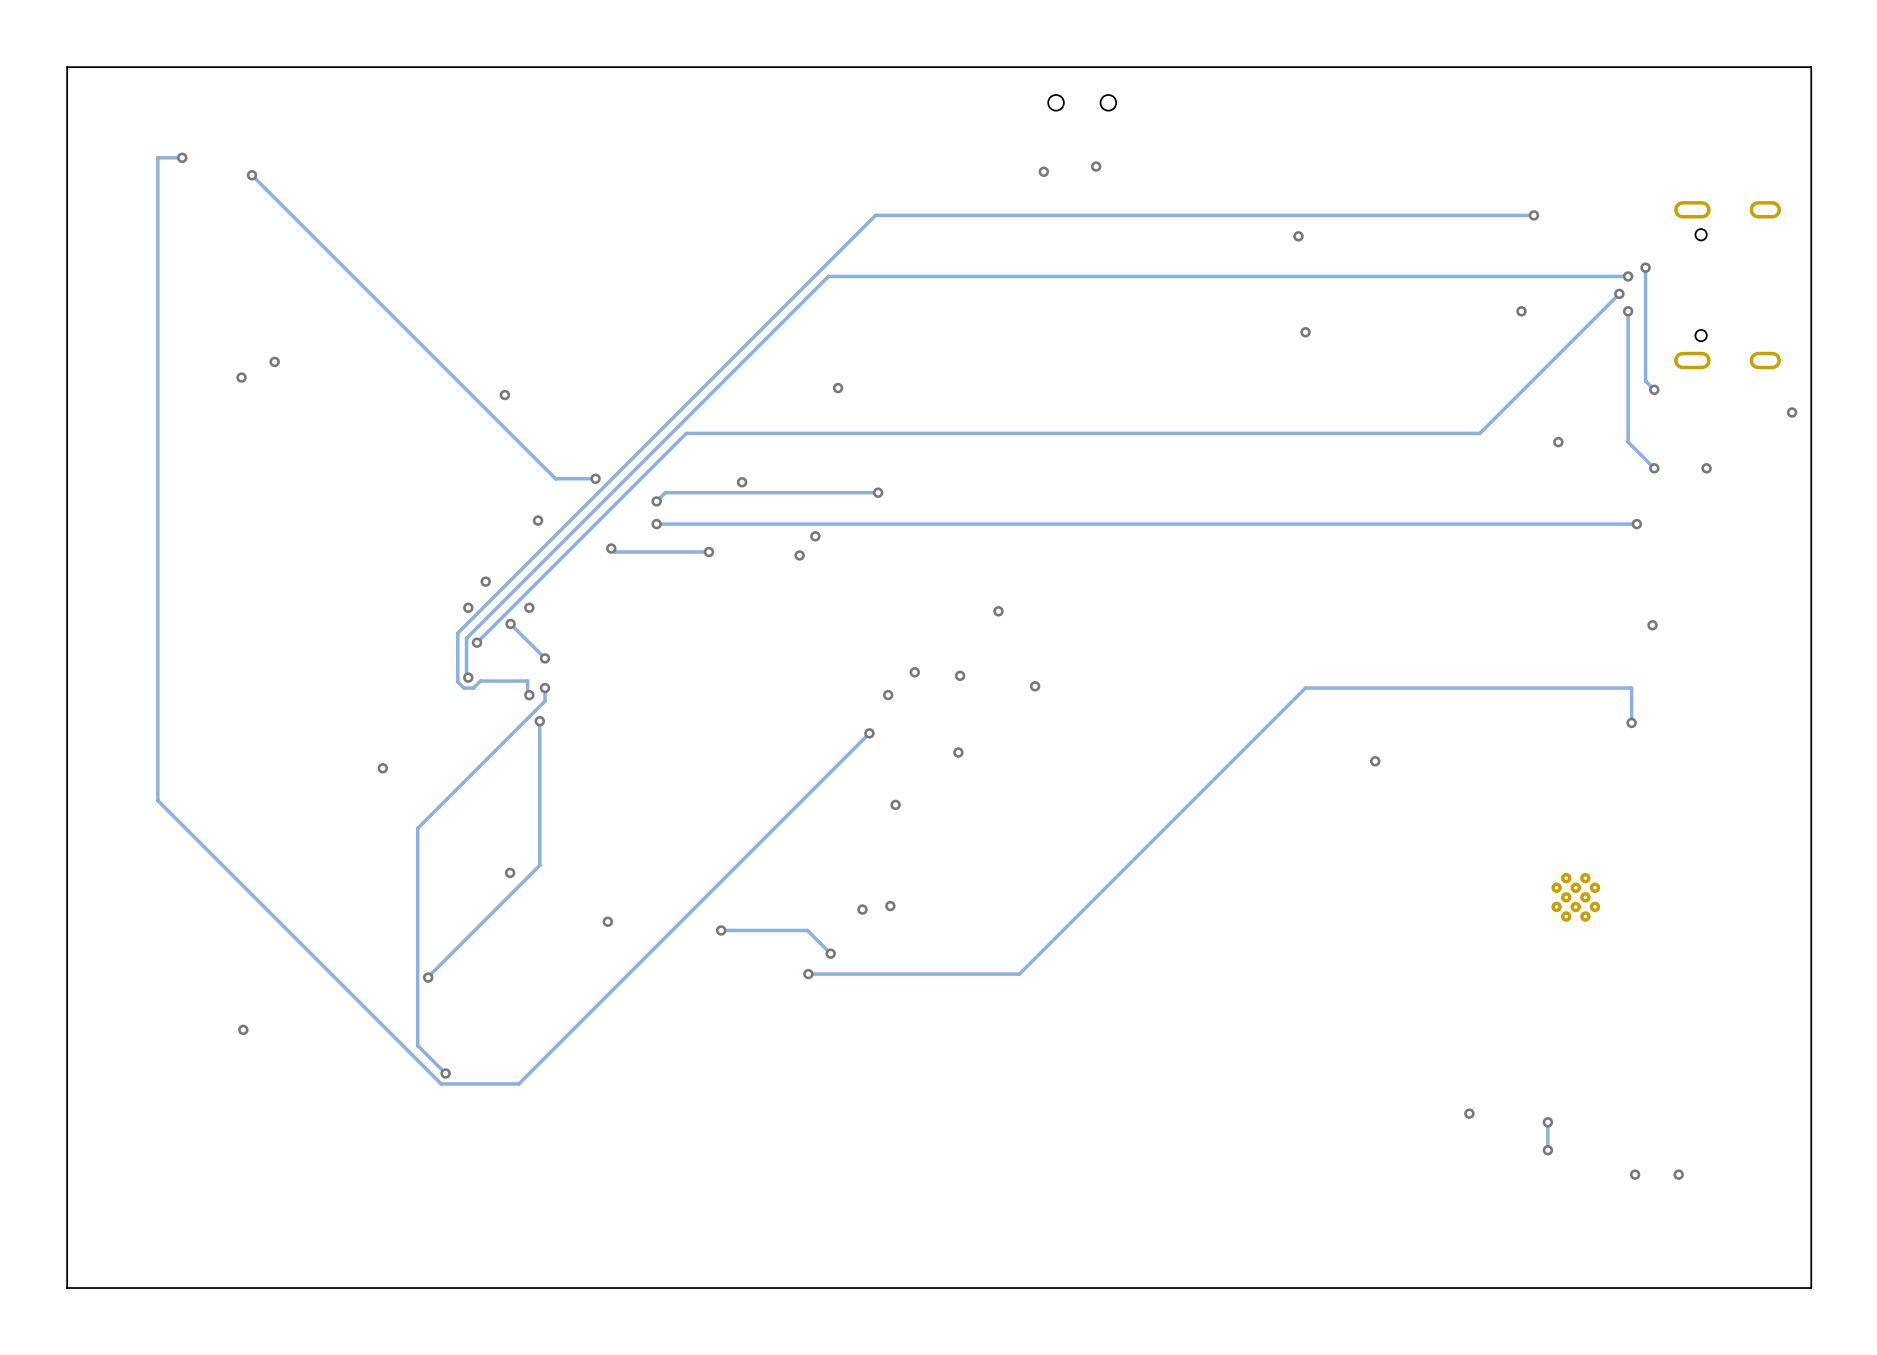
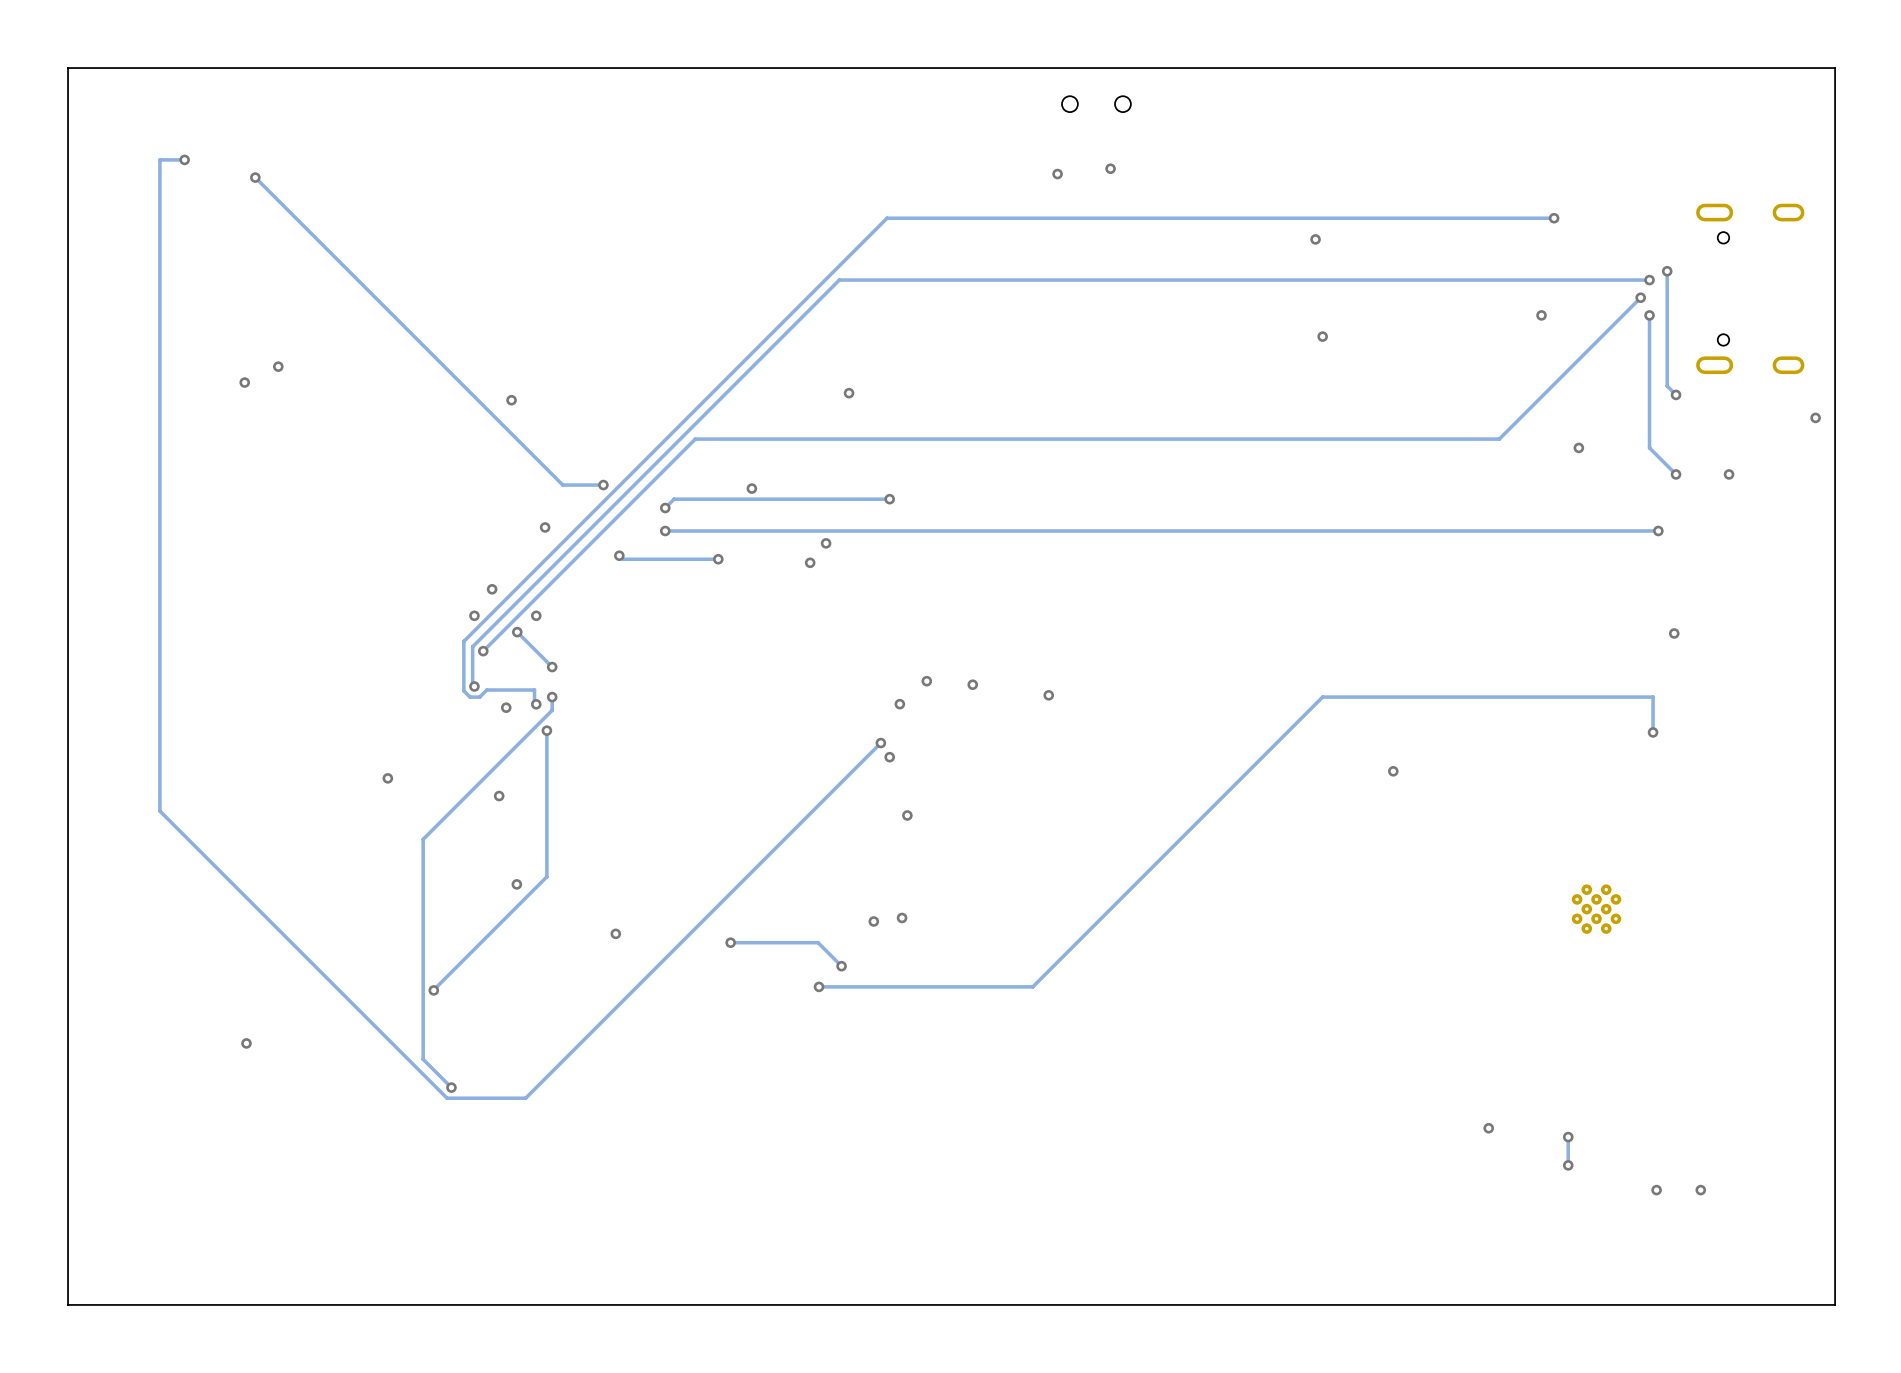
via: (998, 611) -> none
via: none -> (506, 707)
via position: (958, 752) -> (889, 757)
via: none -> (499, 796)

